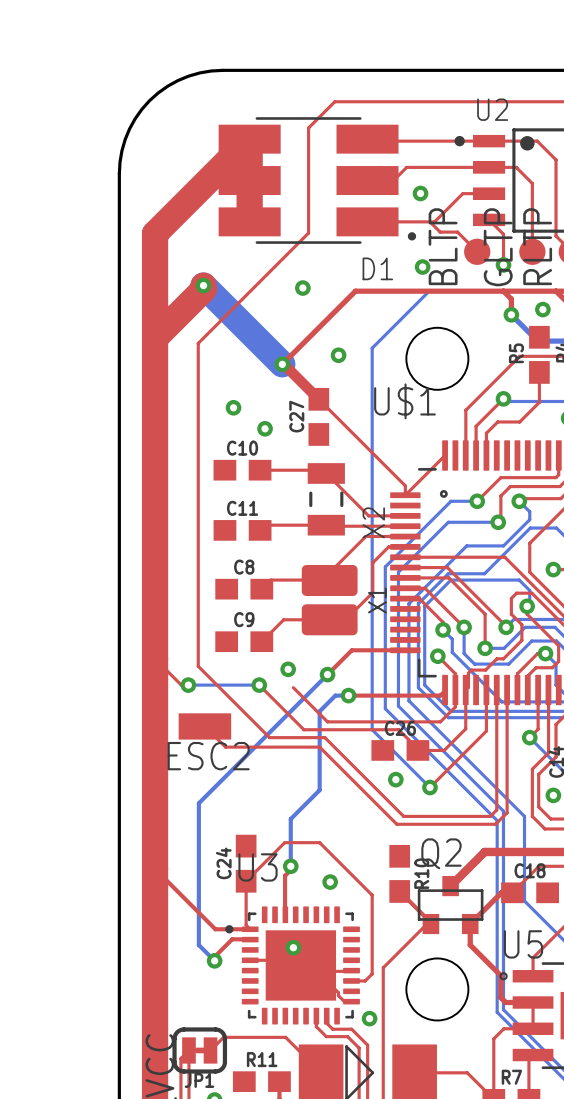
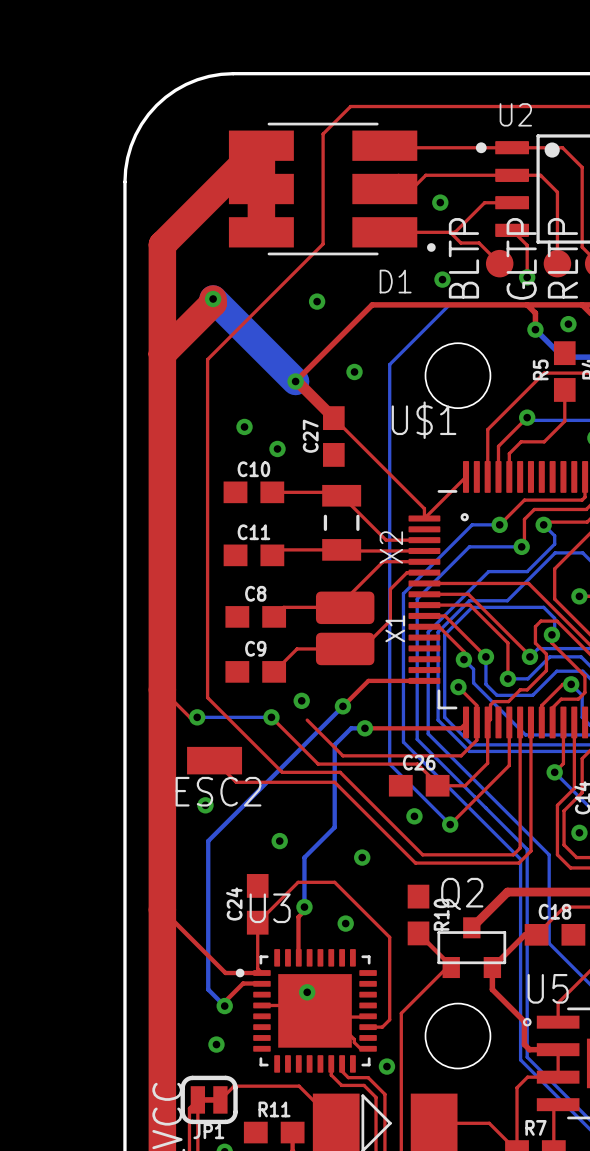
via: none -> (205, 805)
via: none -> (279, 841)
via: none -> (362, 857)
via: none -> (216, 1044)

